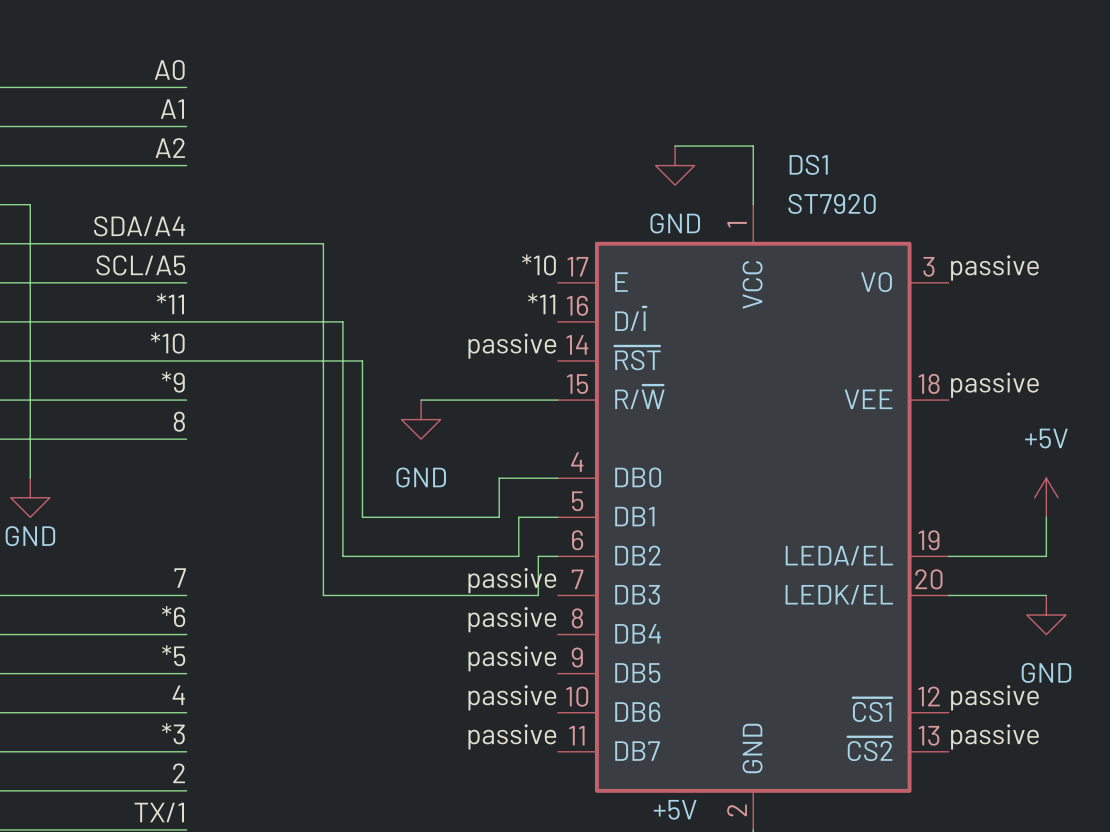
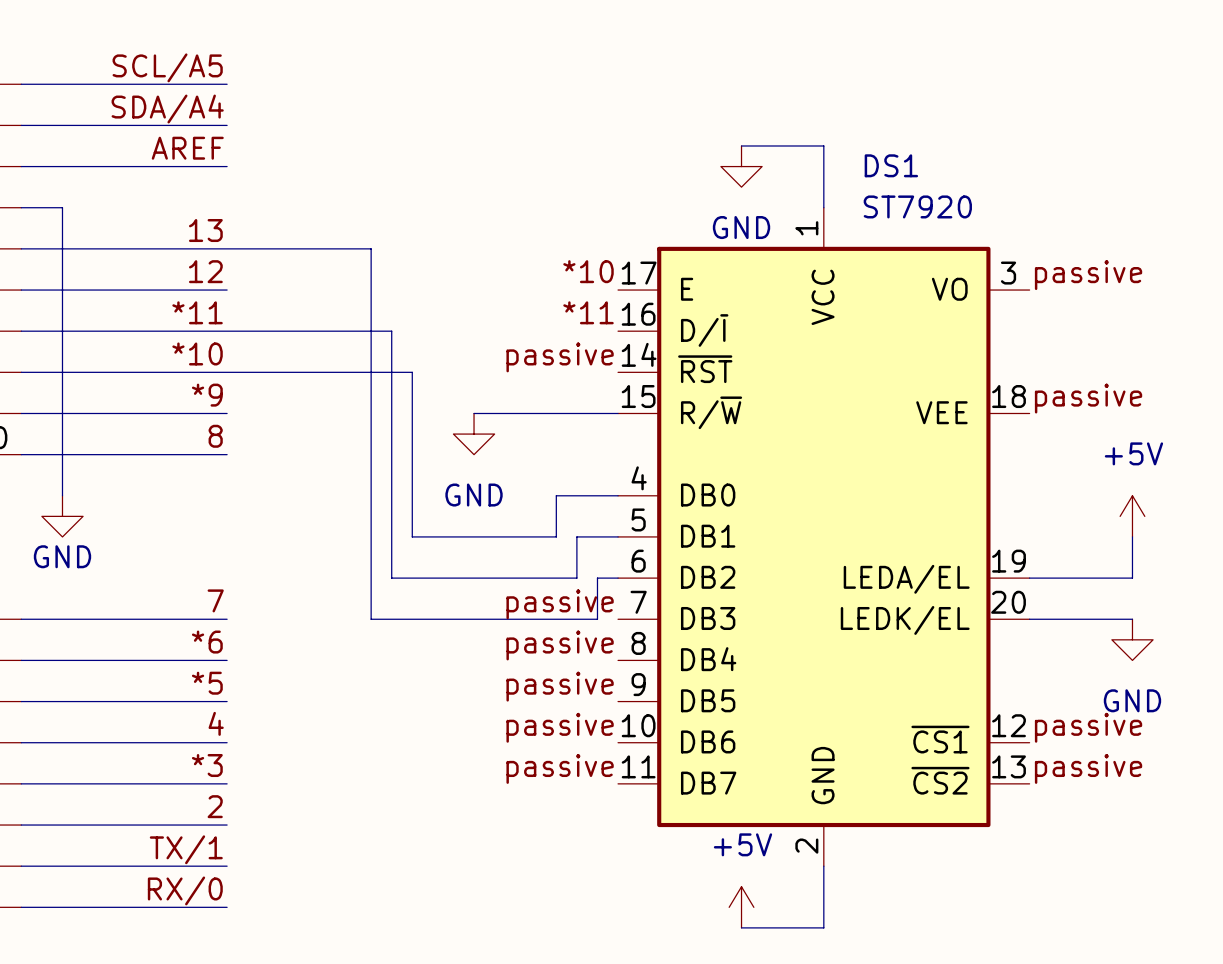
label: A0 (169, 70) -> SCL/A5 (167, 67)
label: A1 (172, 109) -> SDA/A4 (167, 109)
label: A2 (170, 148) -> AREF (187, 148)
label: SDA/A4 (139, 226) -> 13 (205, 230)
label: SCL/A5 (140, 265) -> 12 (205, 271)

